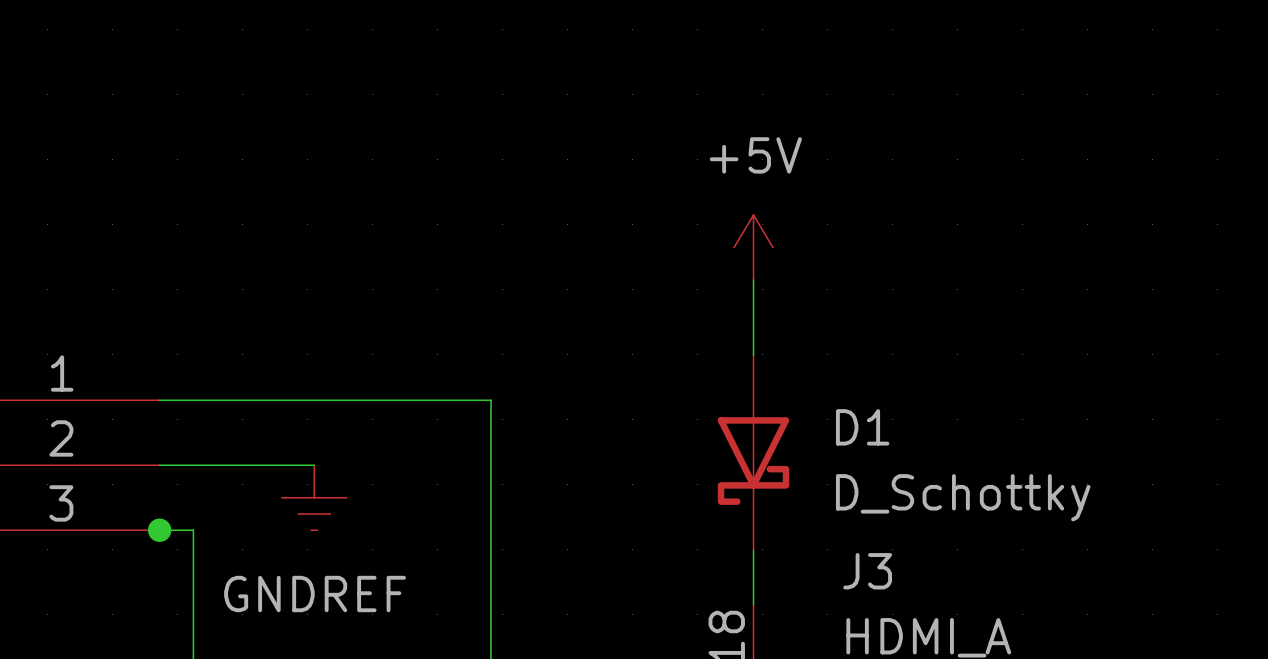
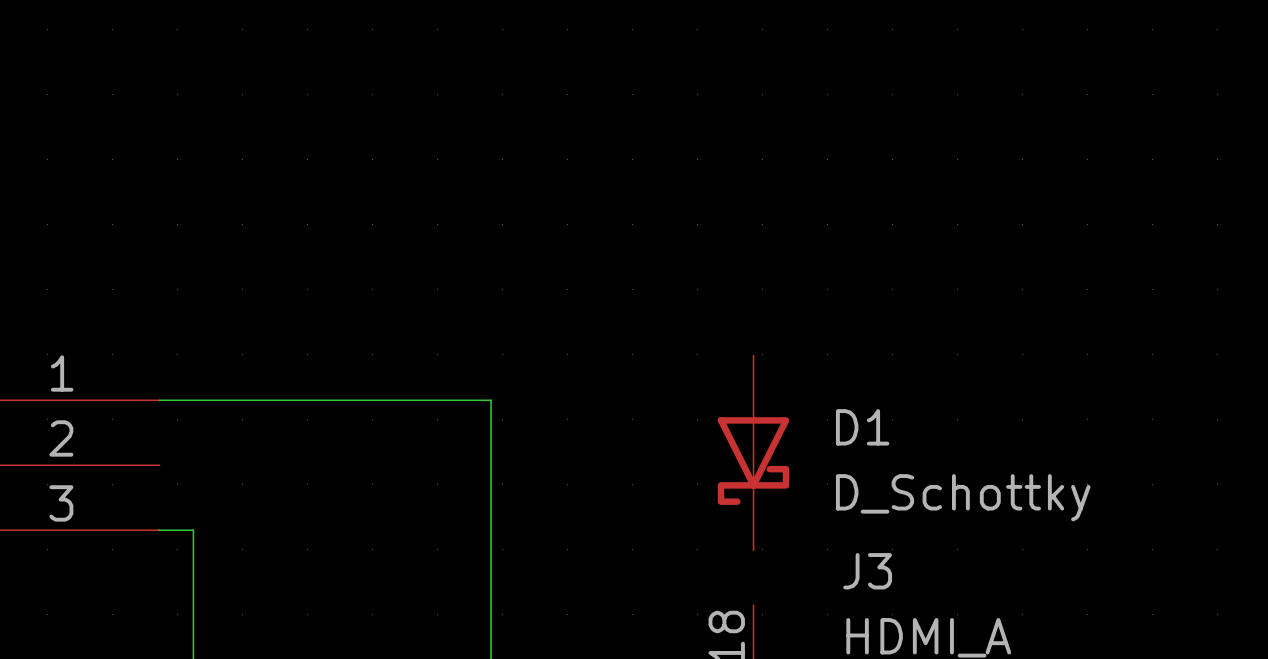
power symbol: +5V (753, 247) -> none
wire: (753, 280) (753, 355) -> none
wire: (159, 465) (314, 465) -> none
power symbol: GNDREF (314, 497) -> none
junction: (159, 530) -> none
wire: (753, 550) (753, 604) -> none

